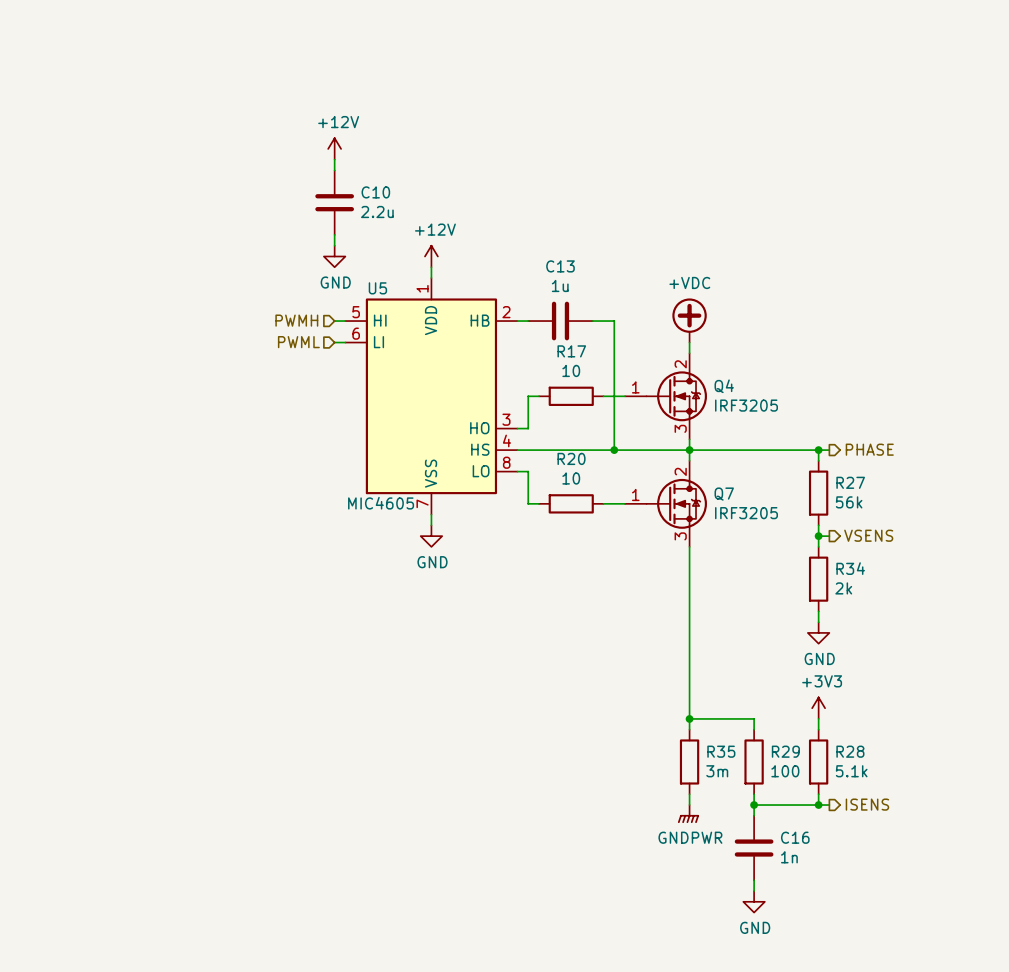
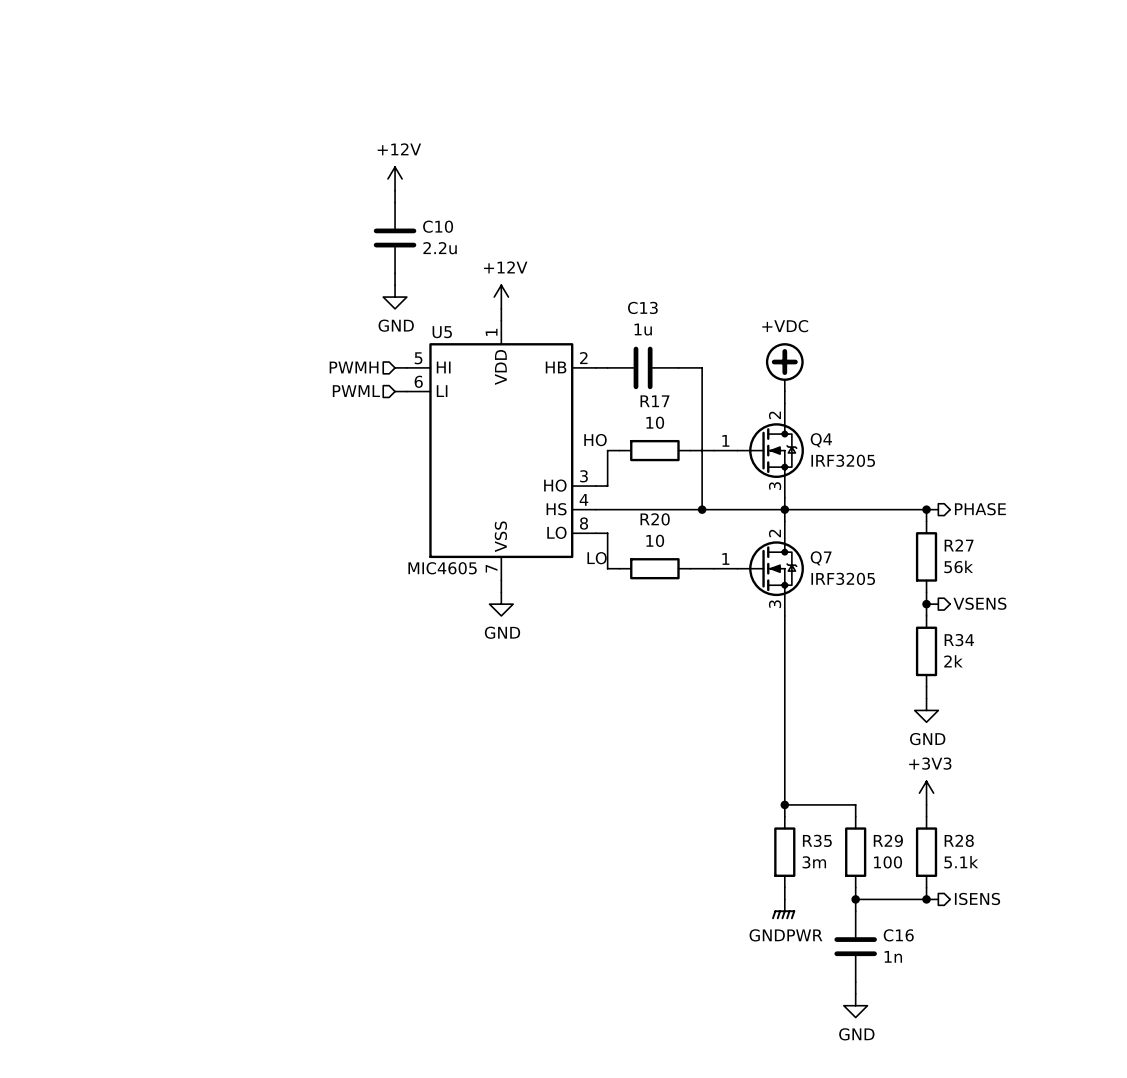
label: none -> HO (595, 440)
label: none -> LO (597, 558)

